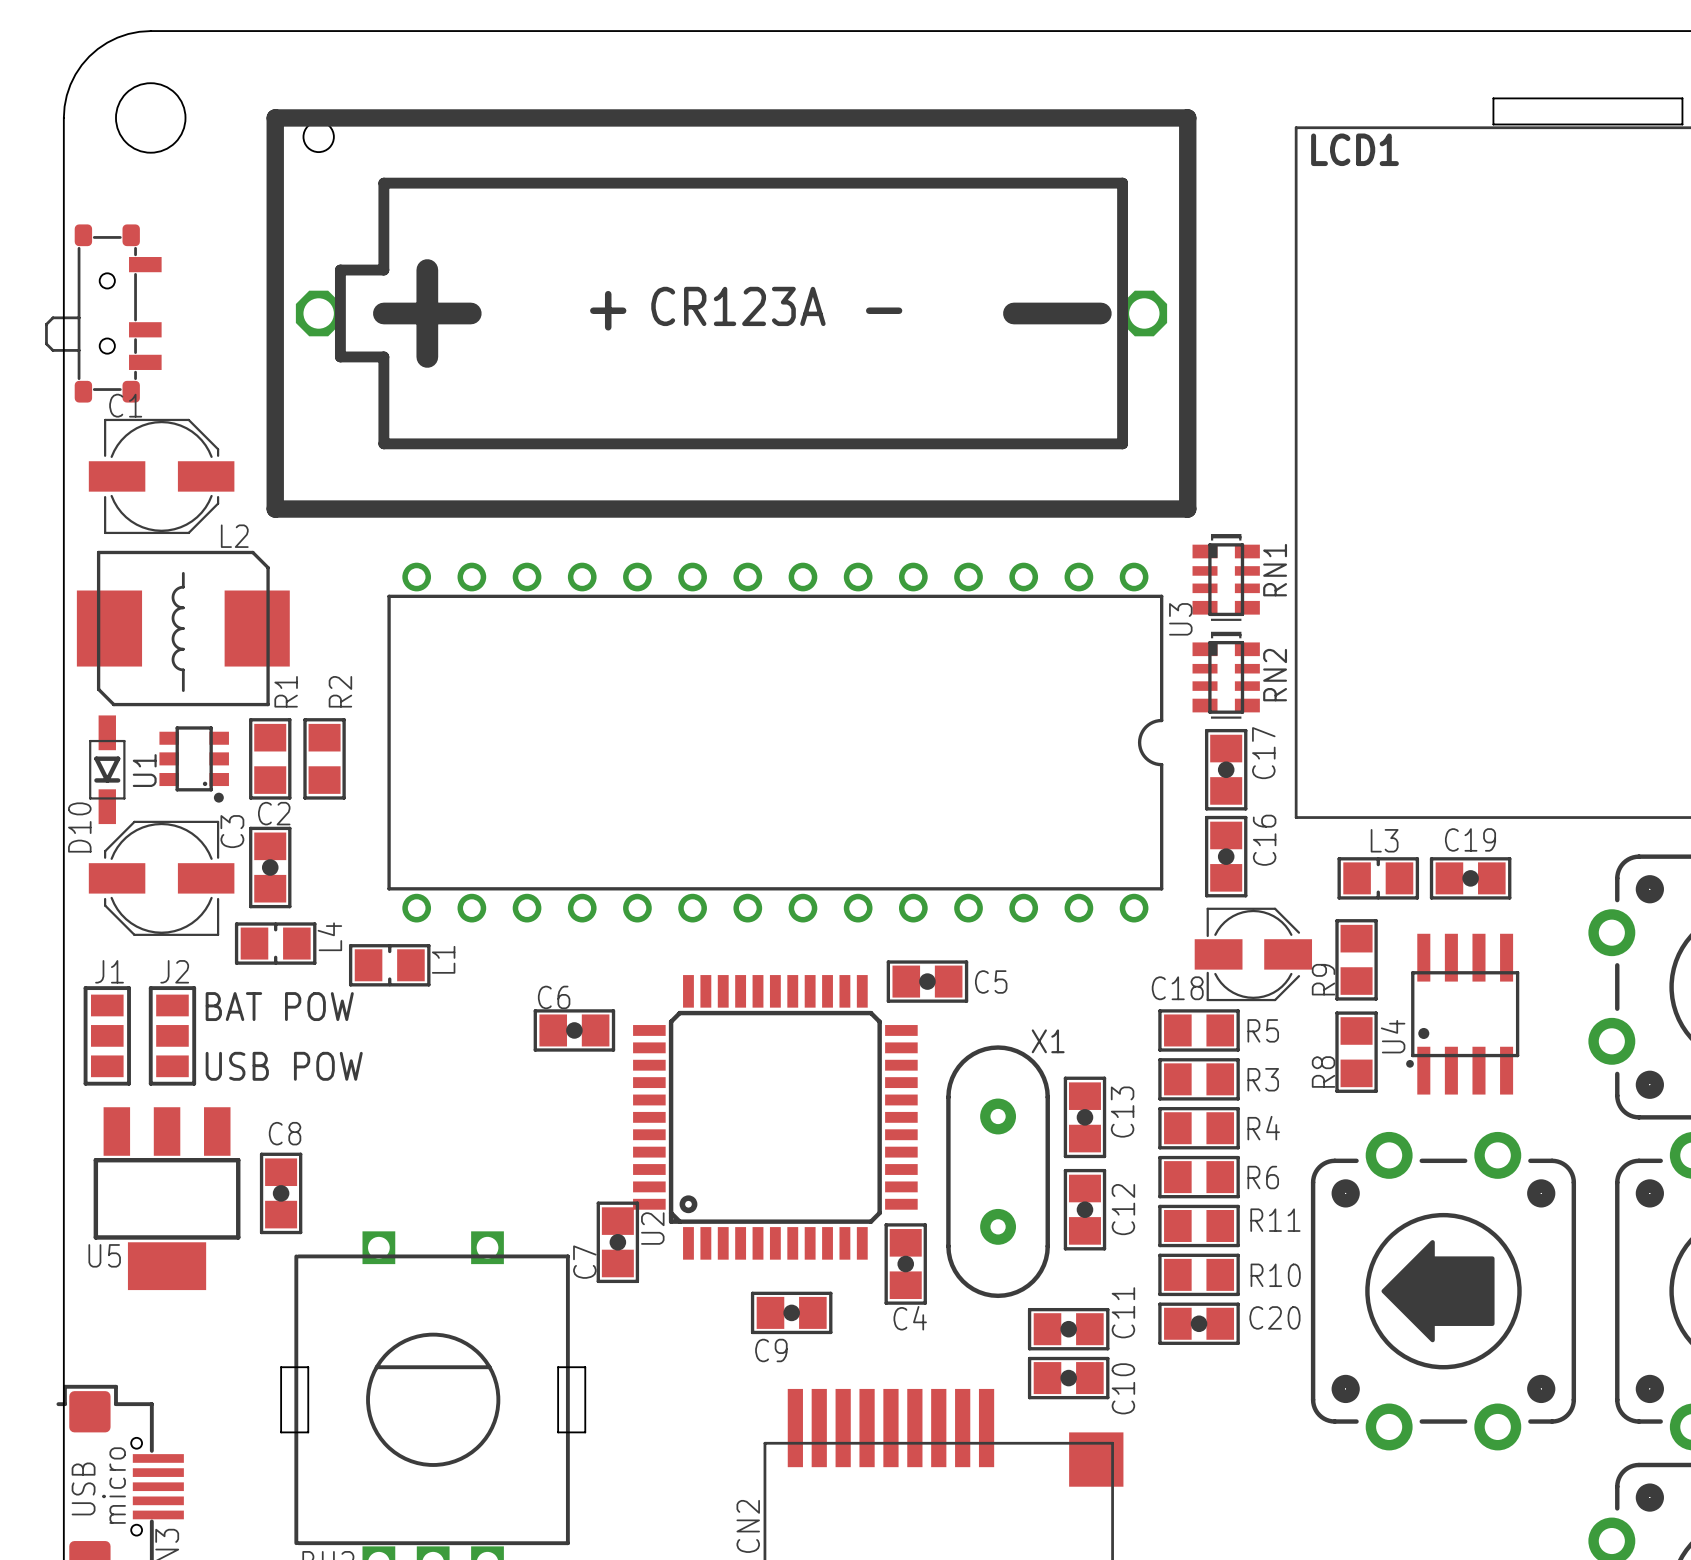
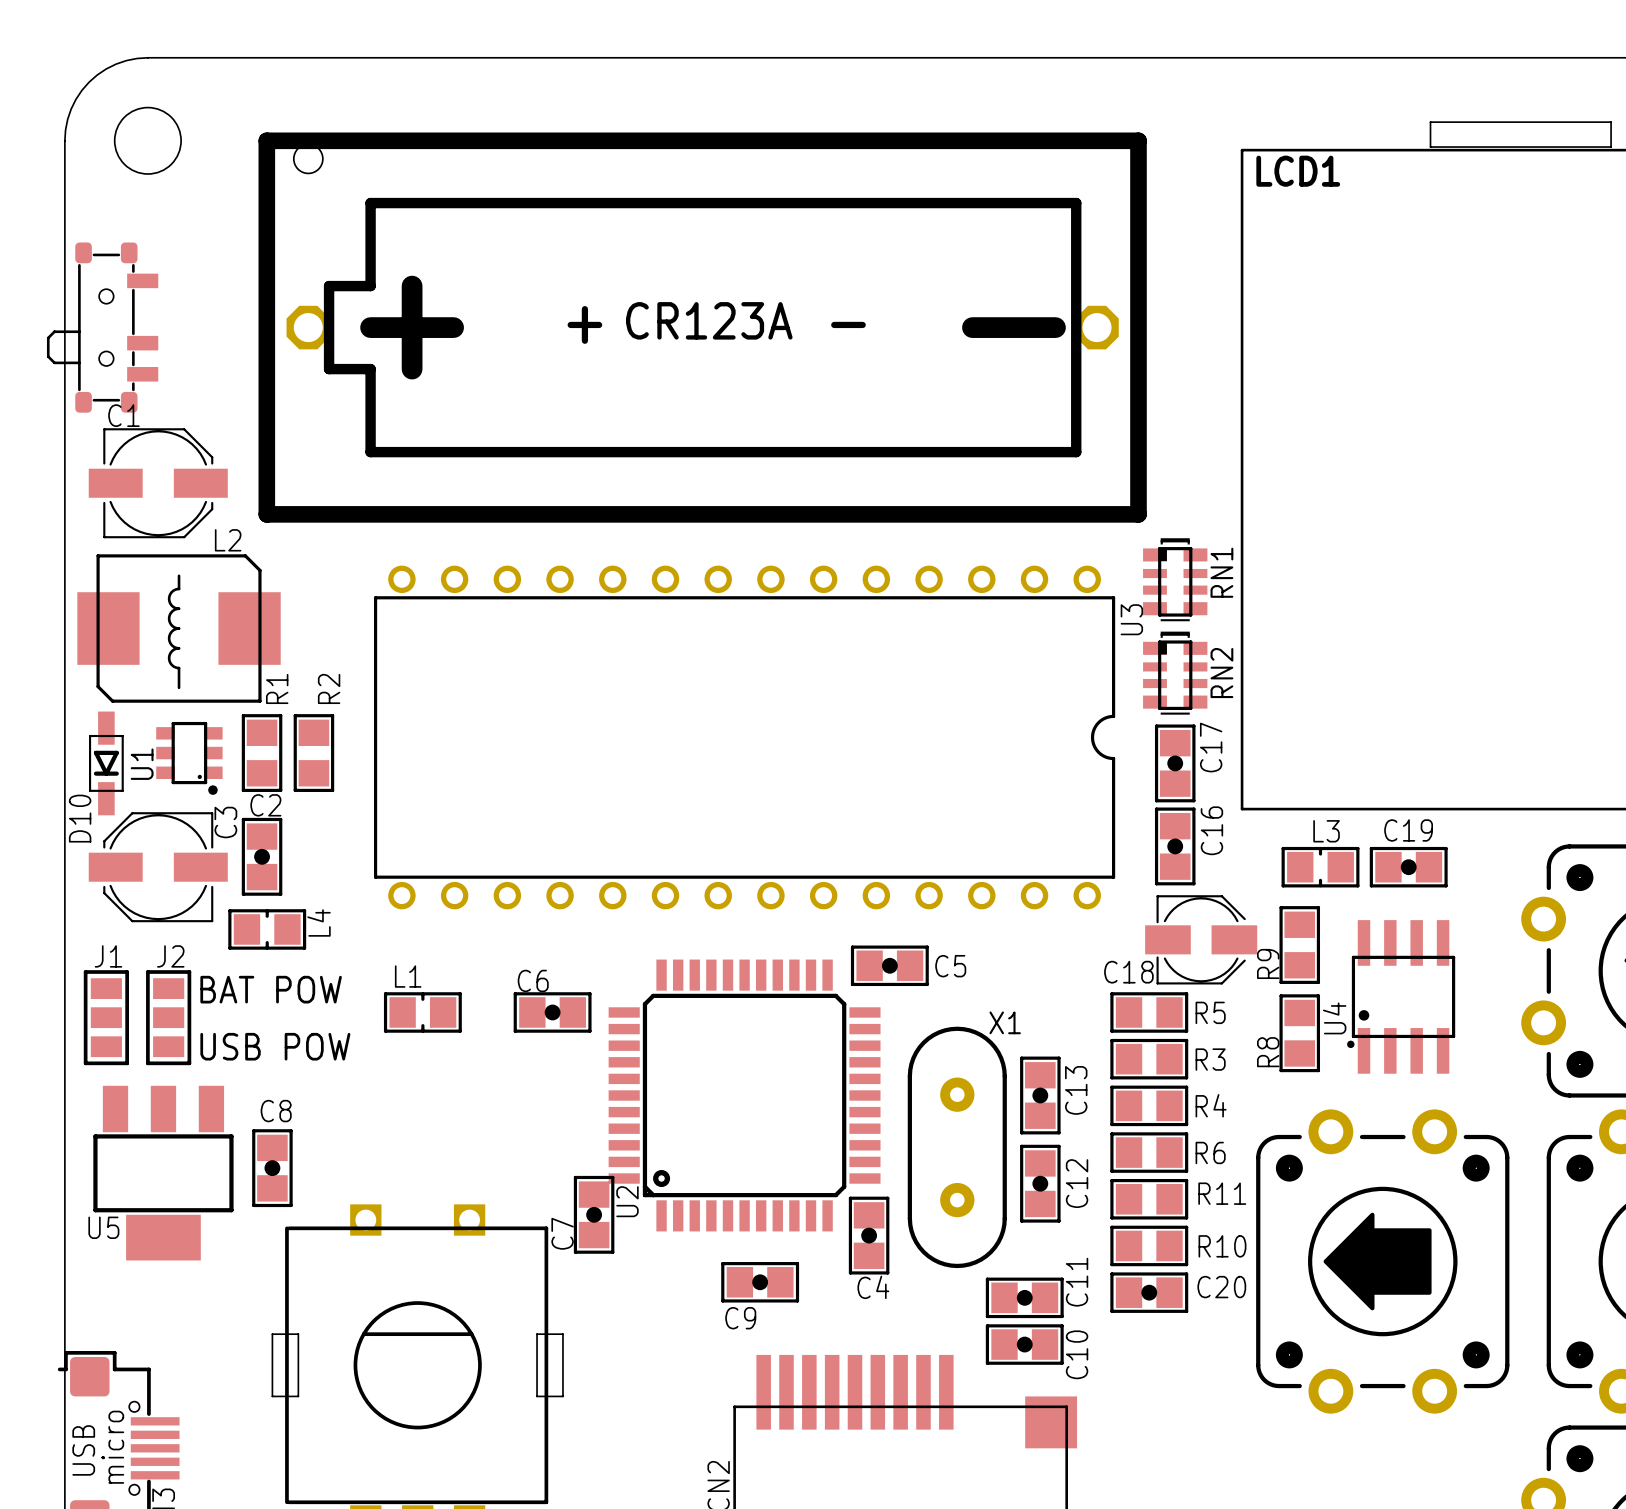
L1 name rotation: 0° (443, 959) -> 90° clockwise (408, 976)
L1 name position: L1 (443, 959) -> L1 (408, 976)
L1 position: (389, 965) -> (422, 1012)

